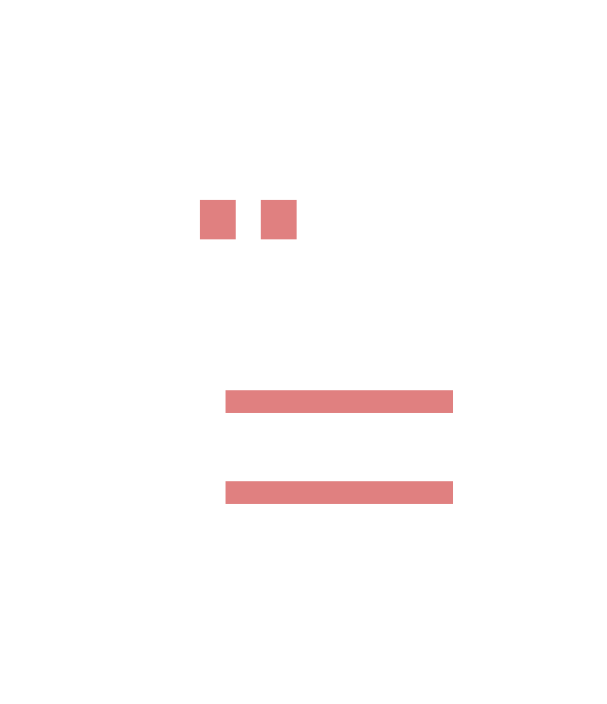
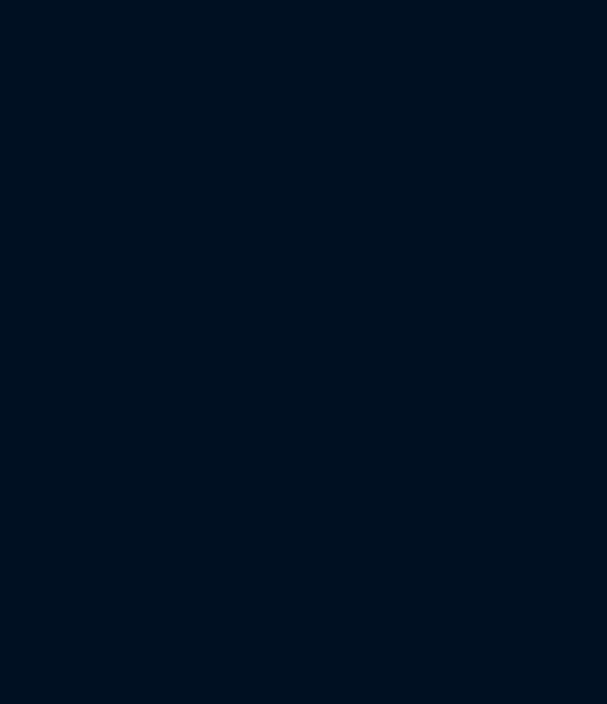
part: (248, 219) -> none
part: (339, 447) -> none

